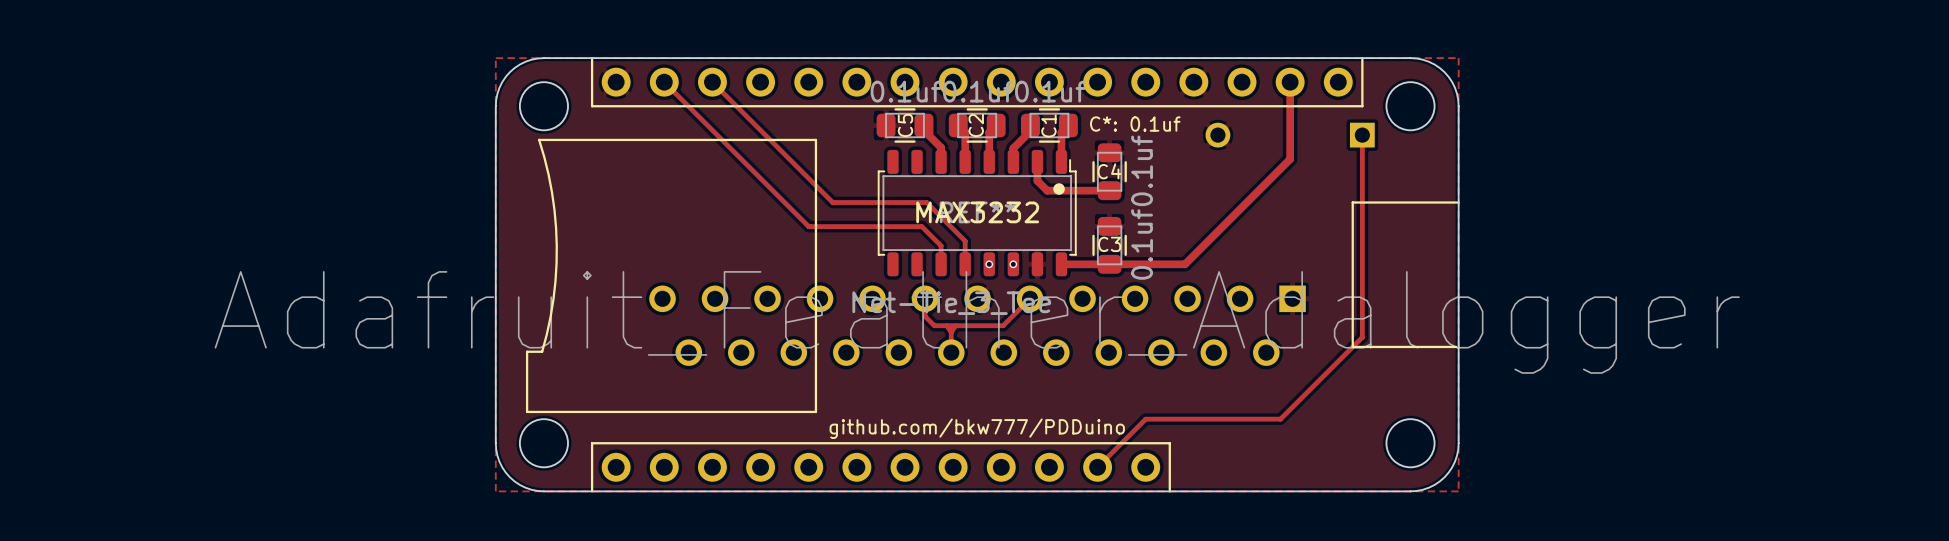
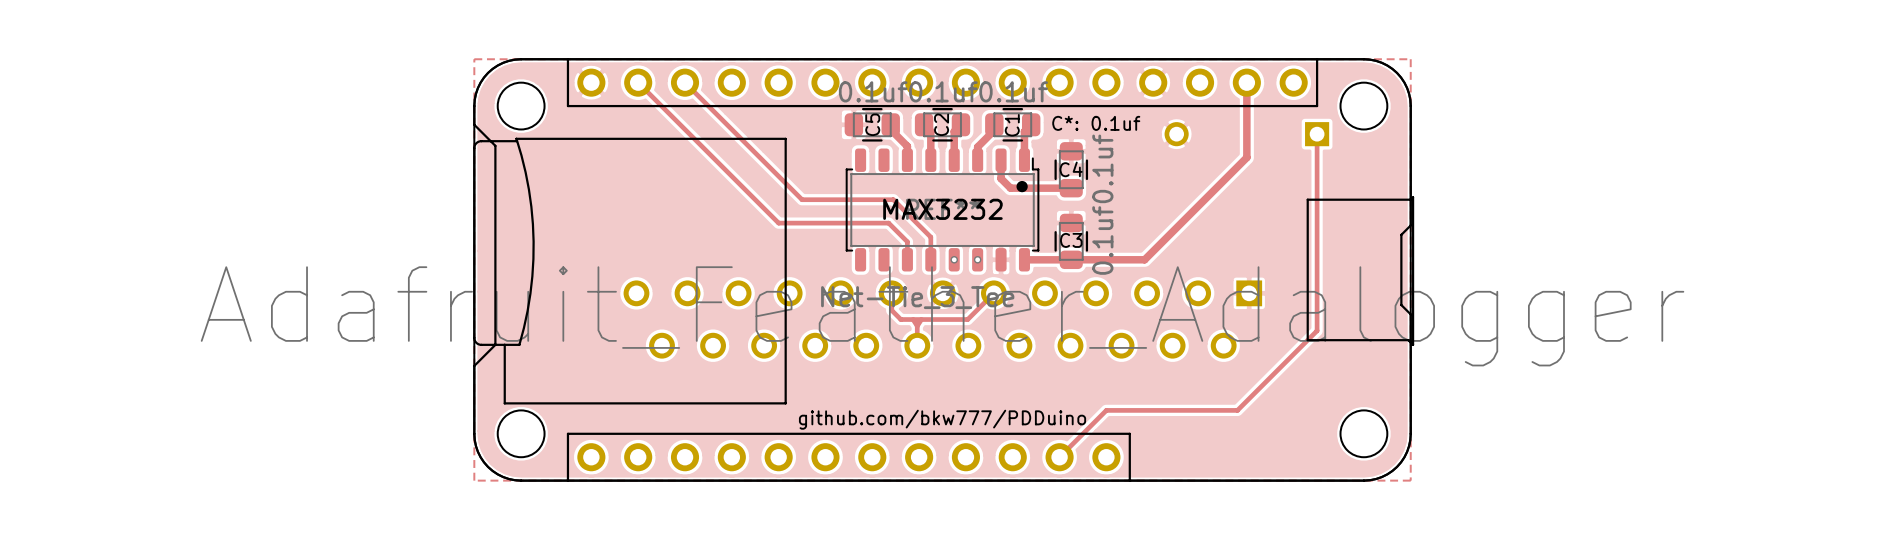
part footprint: [519, 67, 1460, 482] -> [473, 58, 1415, 482]

